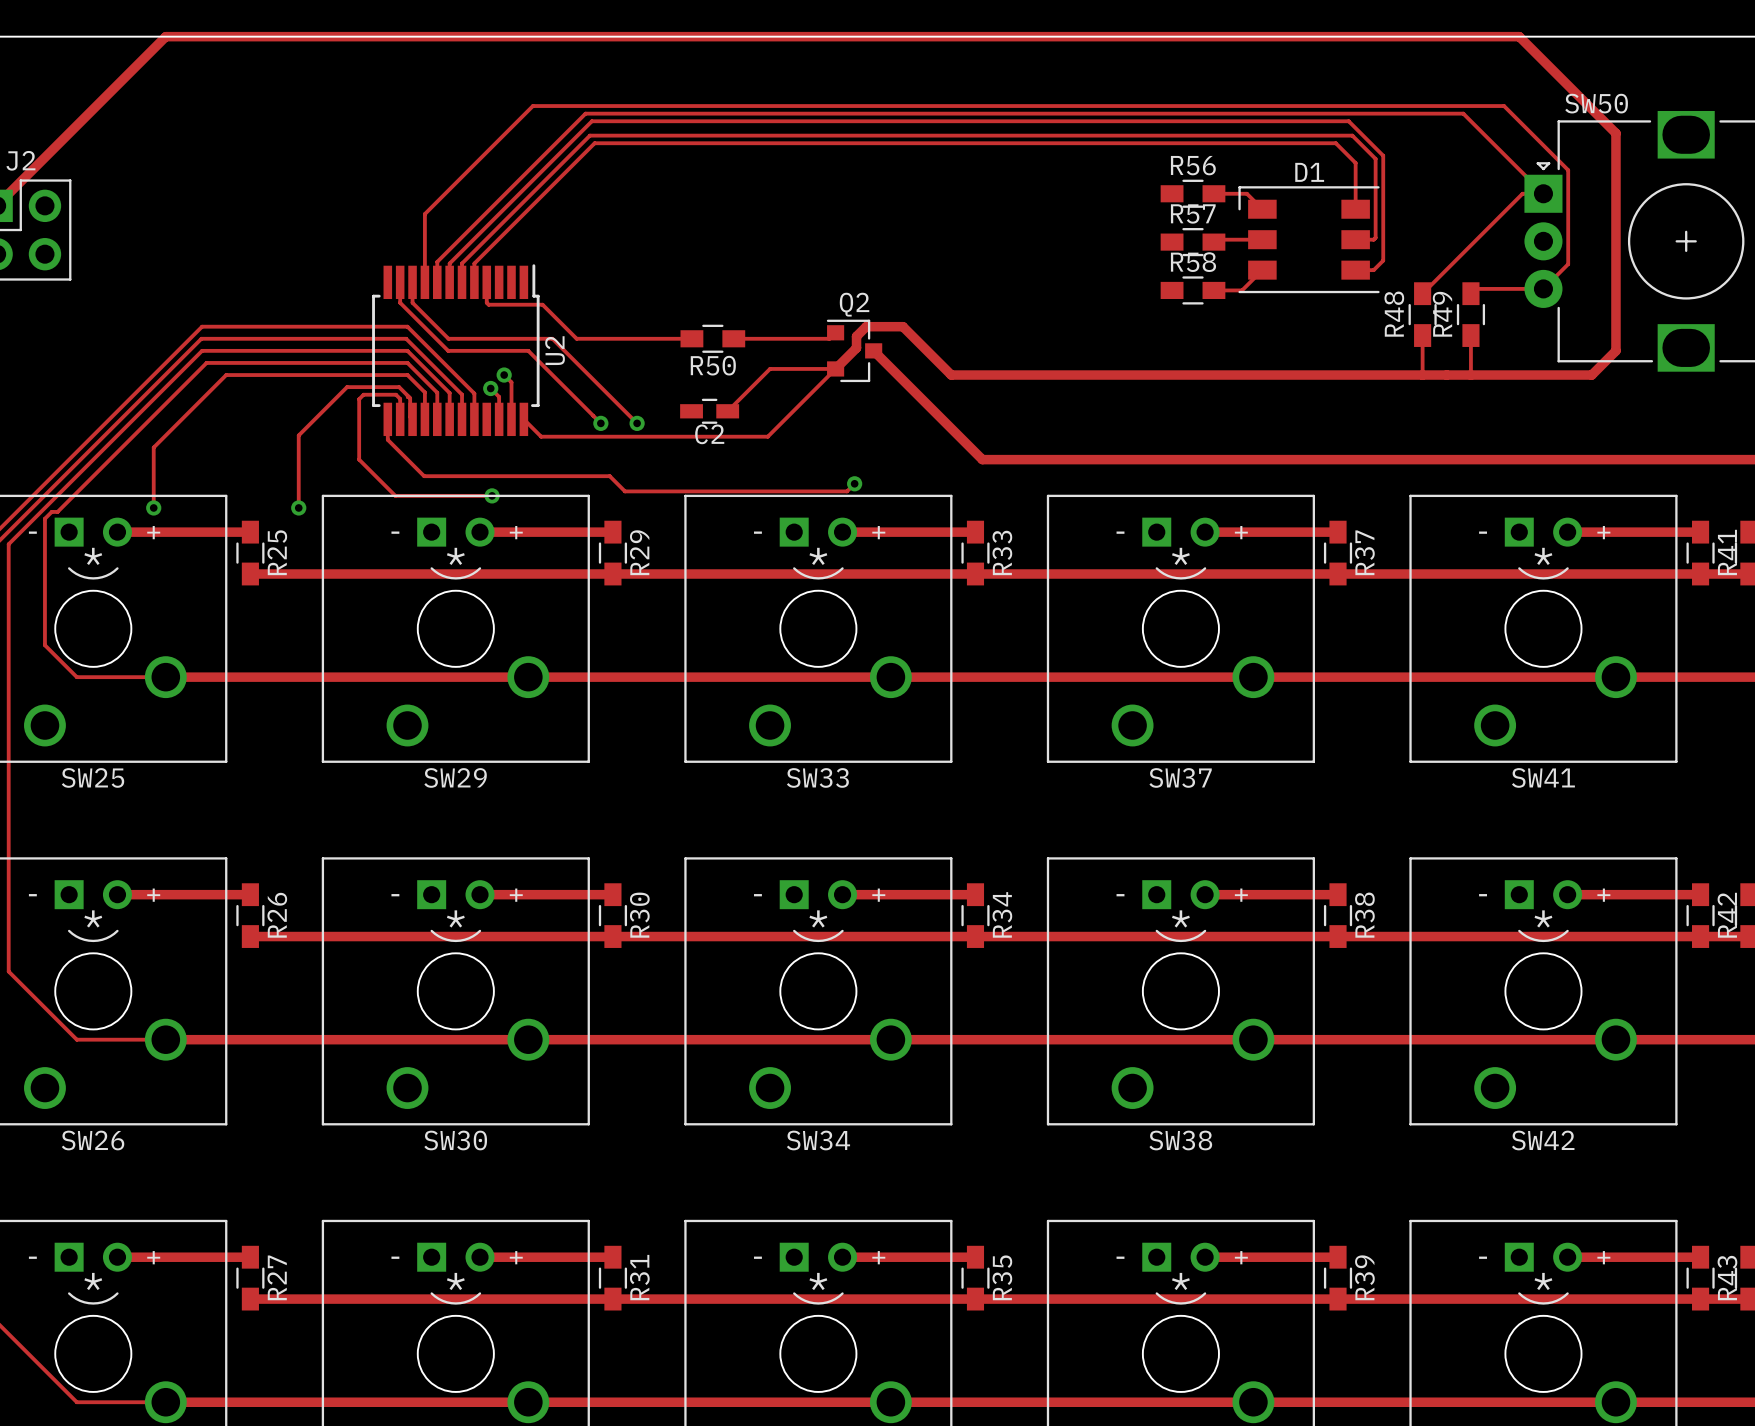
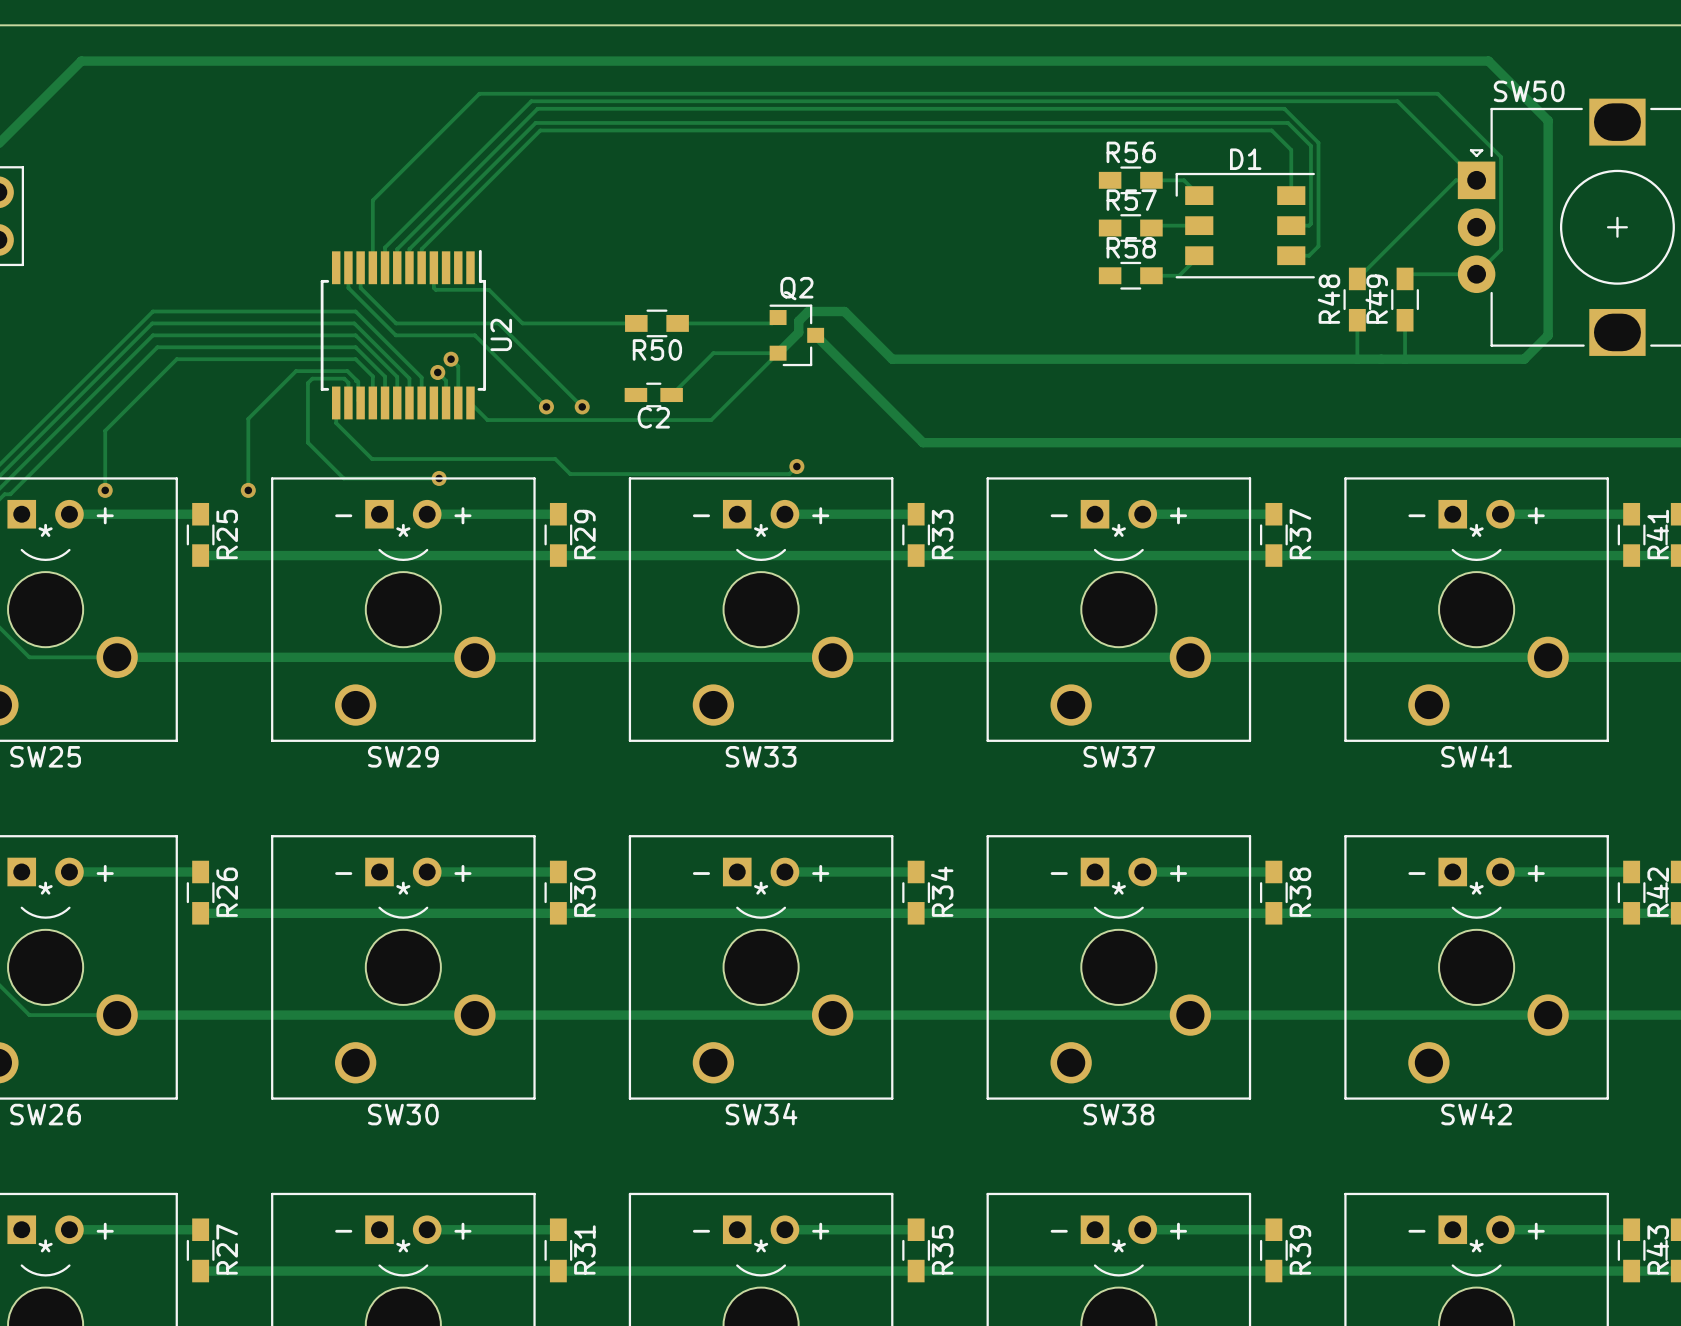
track: (129, 72) (165, 36) (1519, 36) (1555, 72) -> (81, 61) (1488, 61)

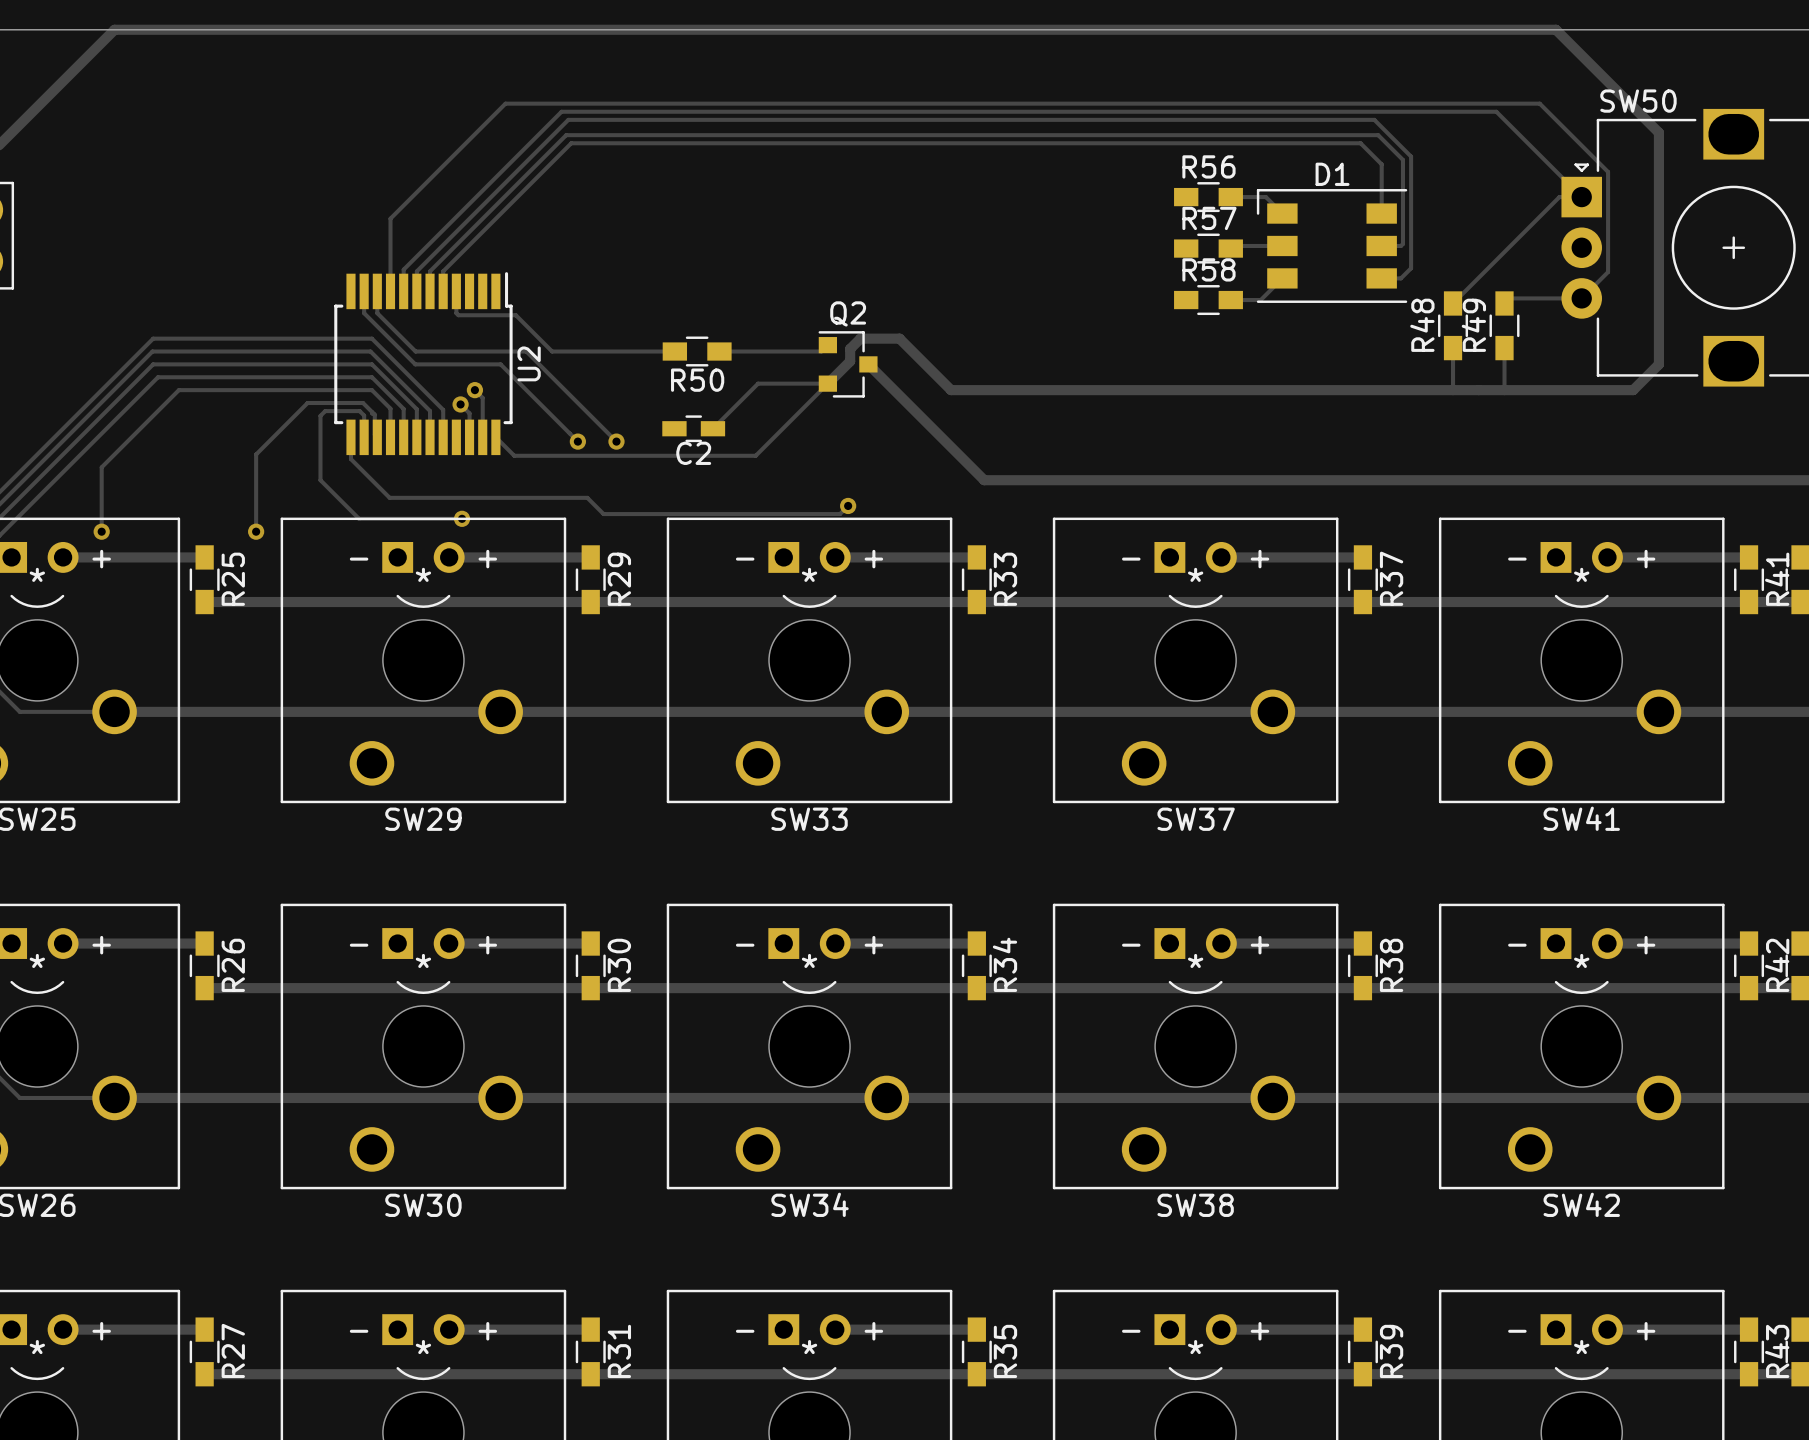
track: (81, 61) (1488, 61) -> (75, 68) (114, 29) (1555, 29) (1594, 68)

